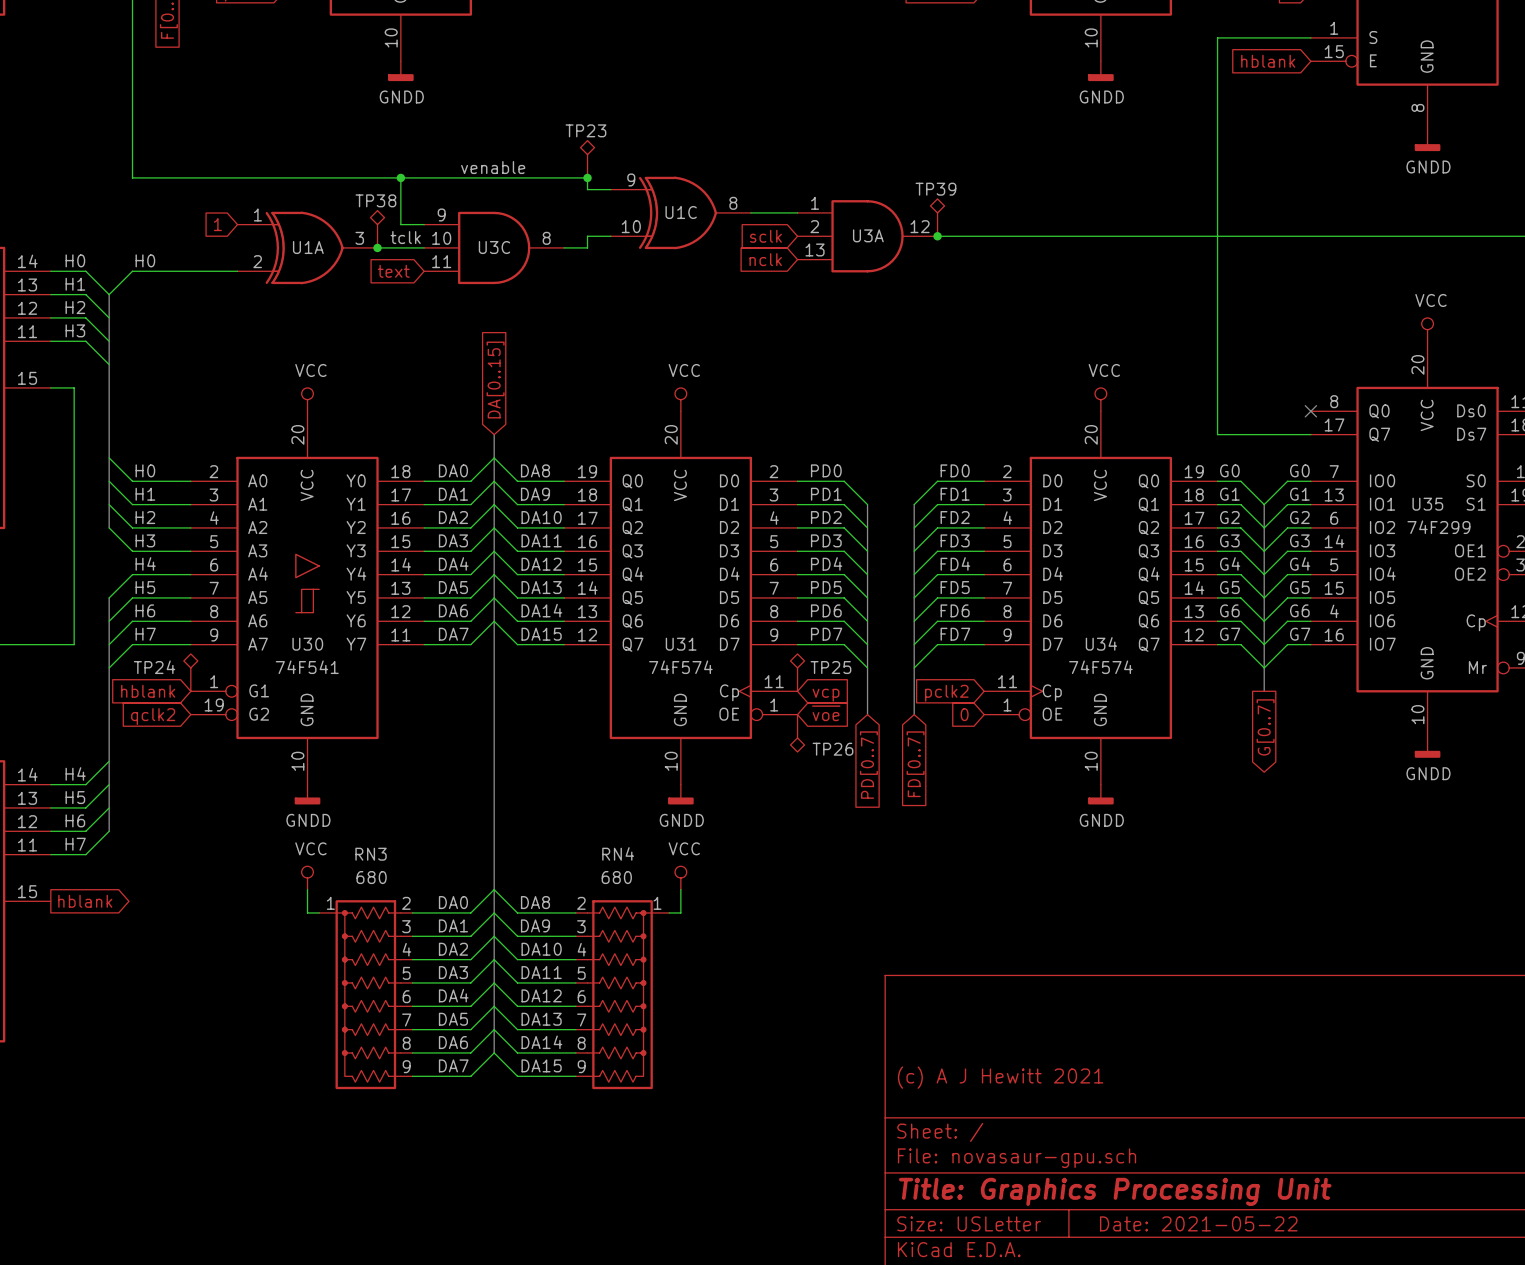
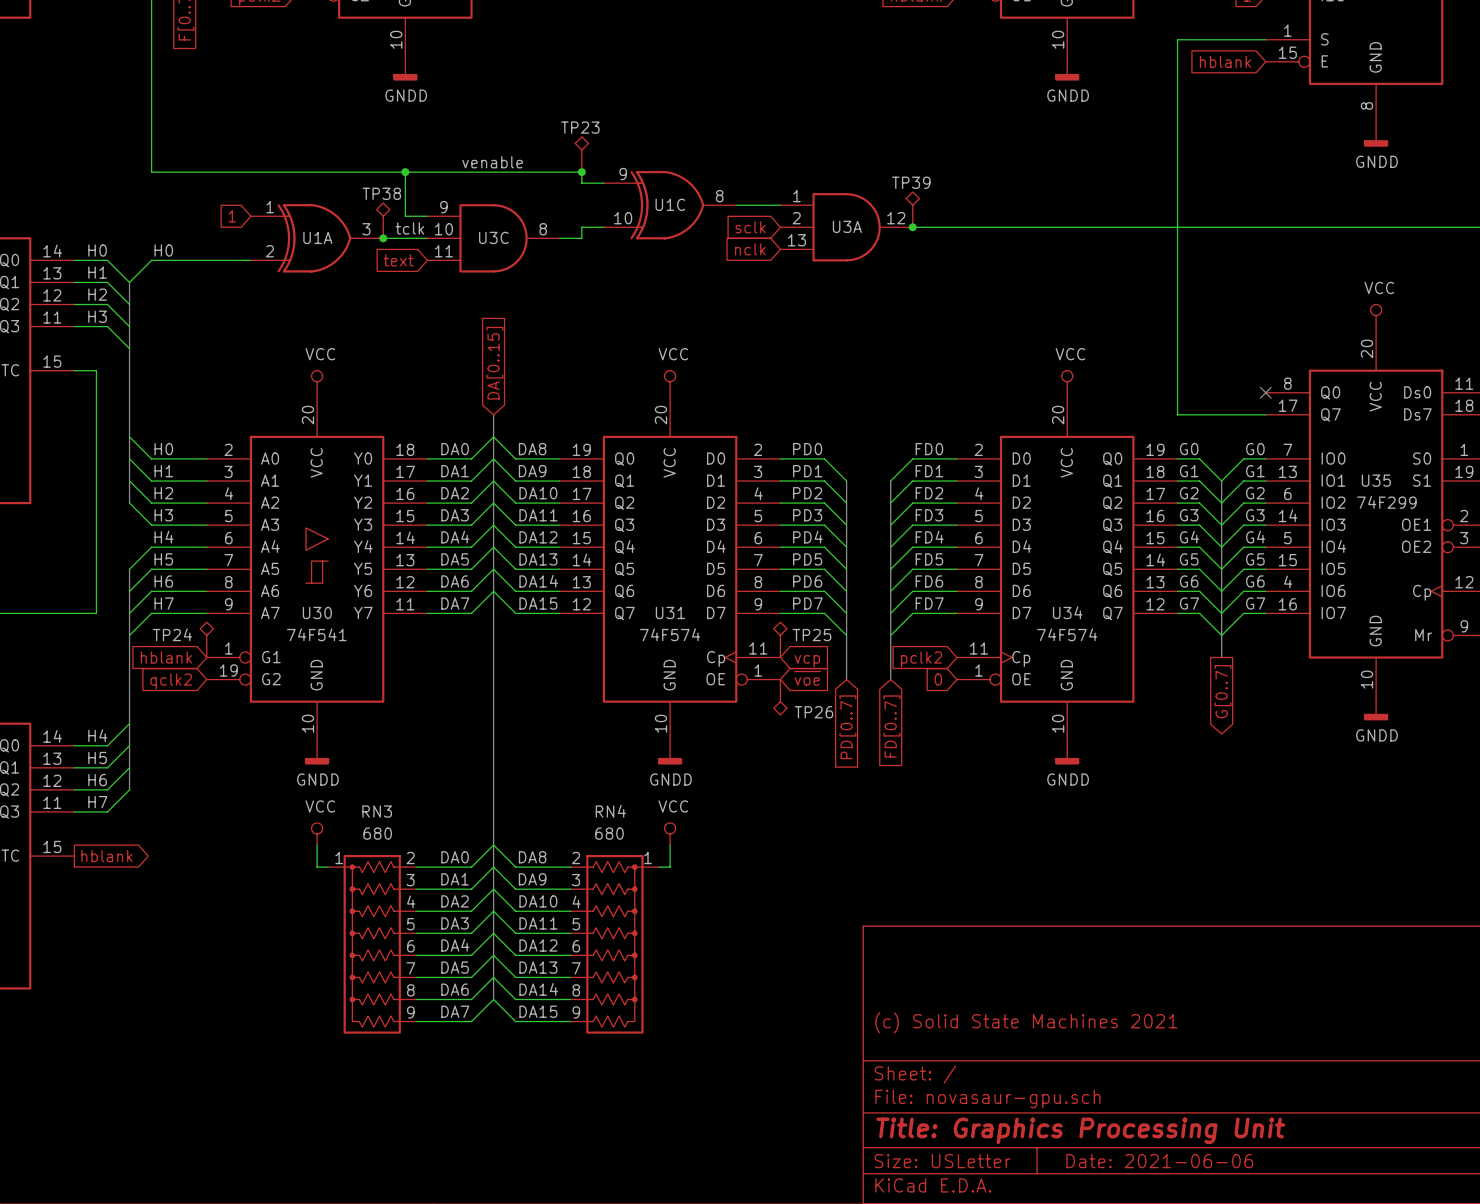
title block: (c) A J Hewitt 2021 (1000, 1077) -> (c) Solid State Machines 2021 (1026, 1022)
title block: Date: 2021-05-22 (1198, 1223) -> Date: 2021-06-06 (1159, 1161)

